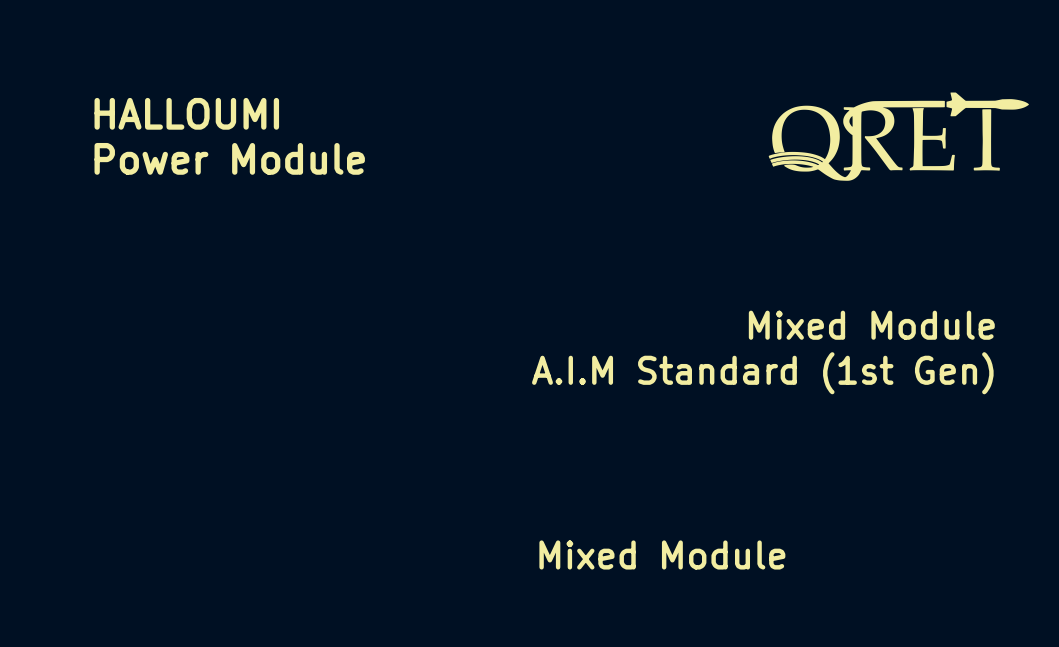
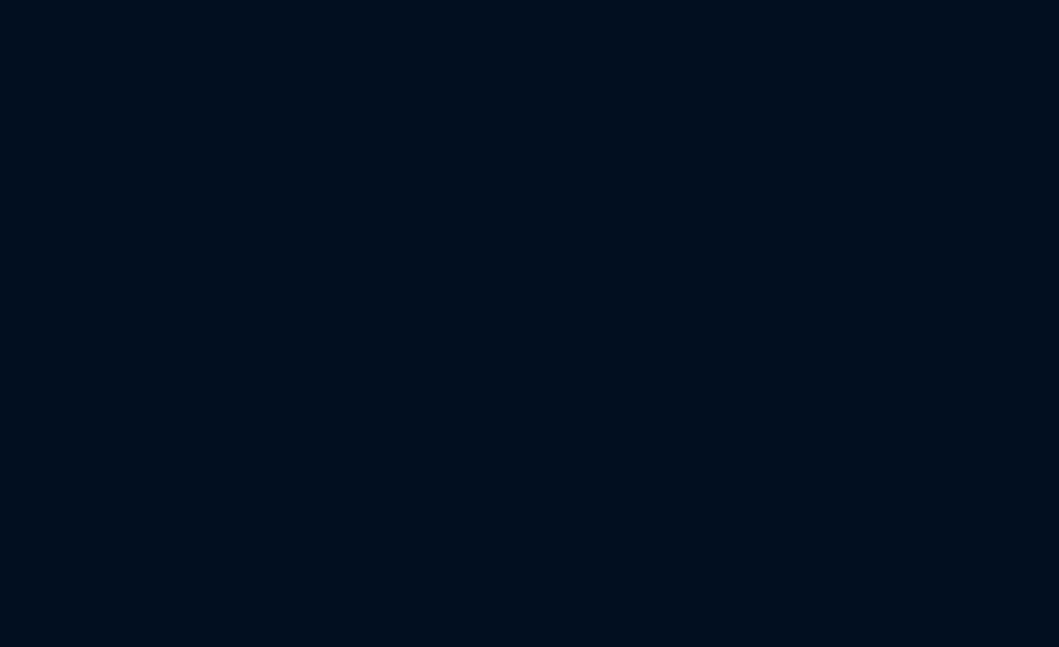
drawing: [768, 92, 1029, 181] -> none
text: HALLOUMI (186, 113) -> none
text: Power Module (229, 158) -> none
text: Mixed Module (871, 325) -> none
text: A.I.M Standard (1st Gen) (762, 373) -> none
text: Mixed Module (662, 554) -> none

